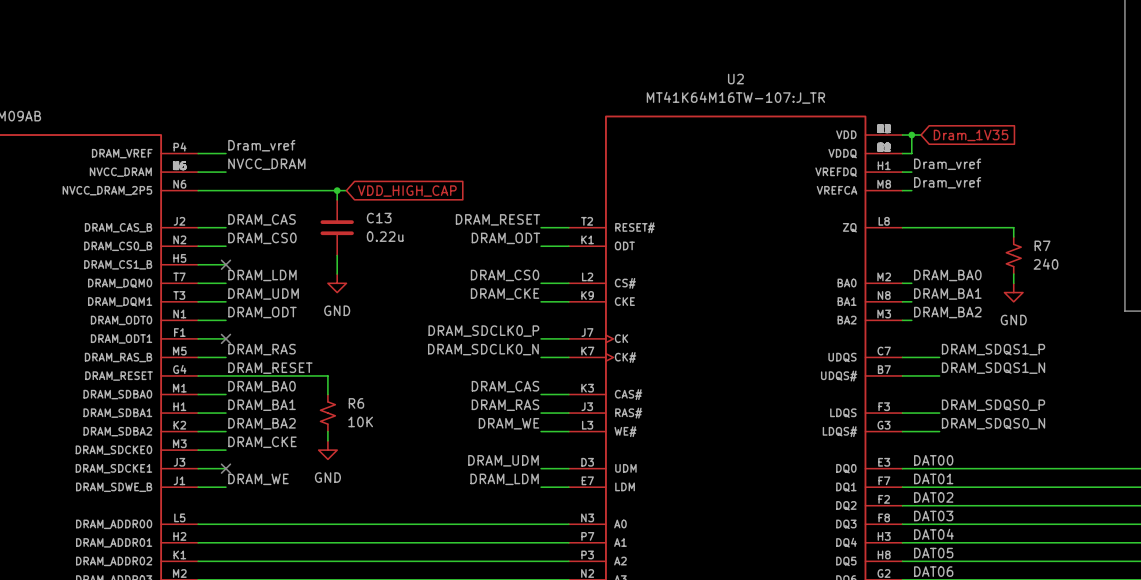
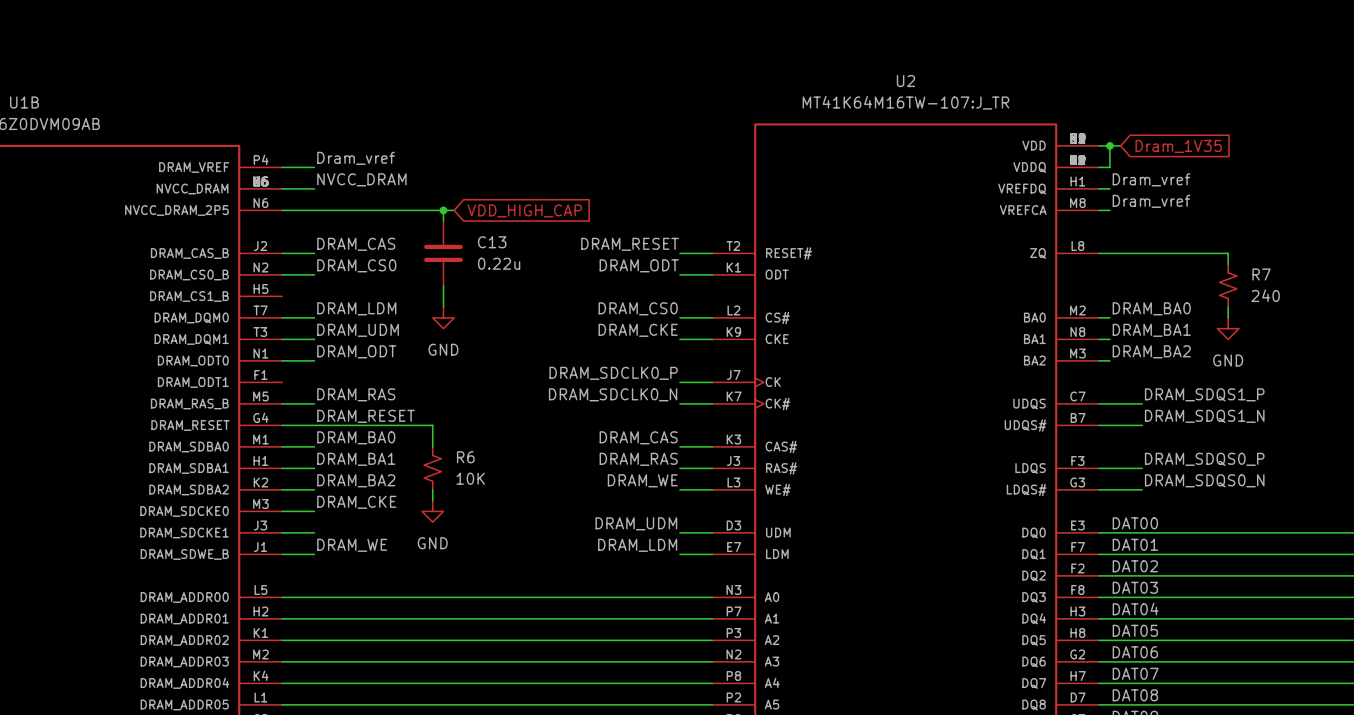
wire: (198, 264) (225, 264) -> none
no-connect mark: (225, 264) -> none
wire: (198, 338) (225, 338) -> none
no-connect mark: (225, 338) -> none
no-connect mark: (225, 468) -> none

